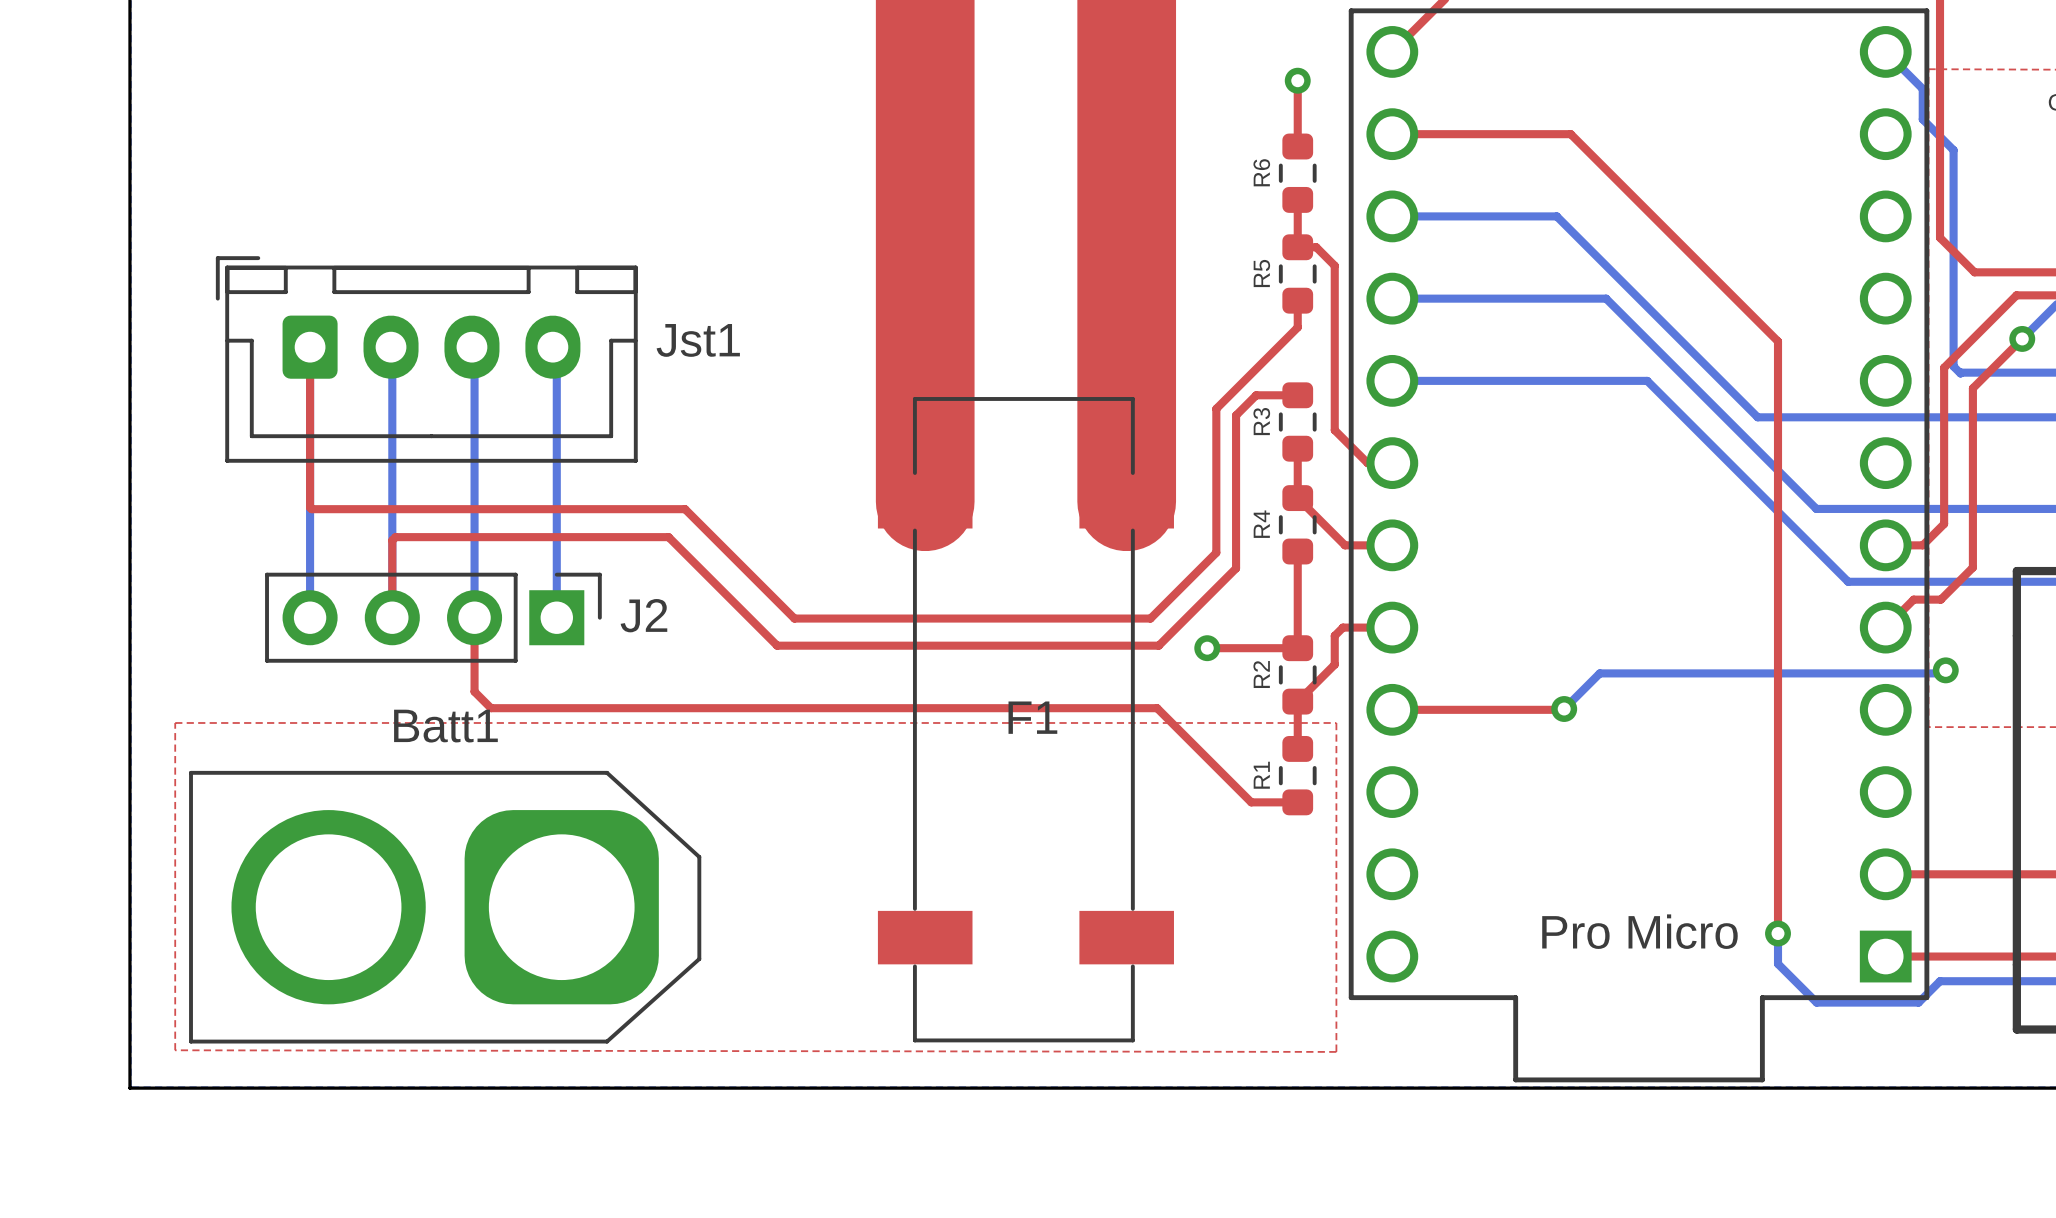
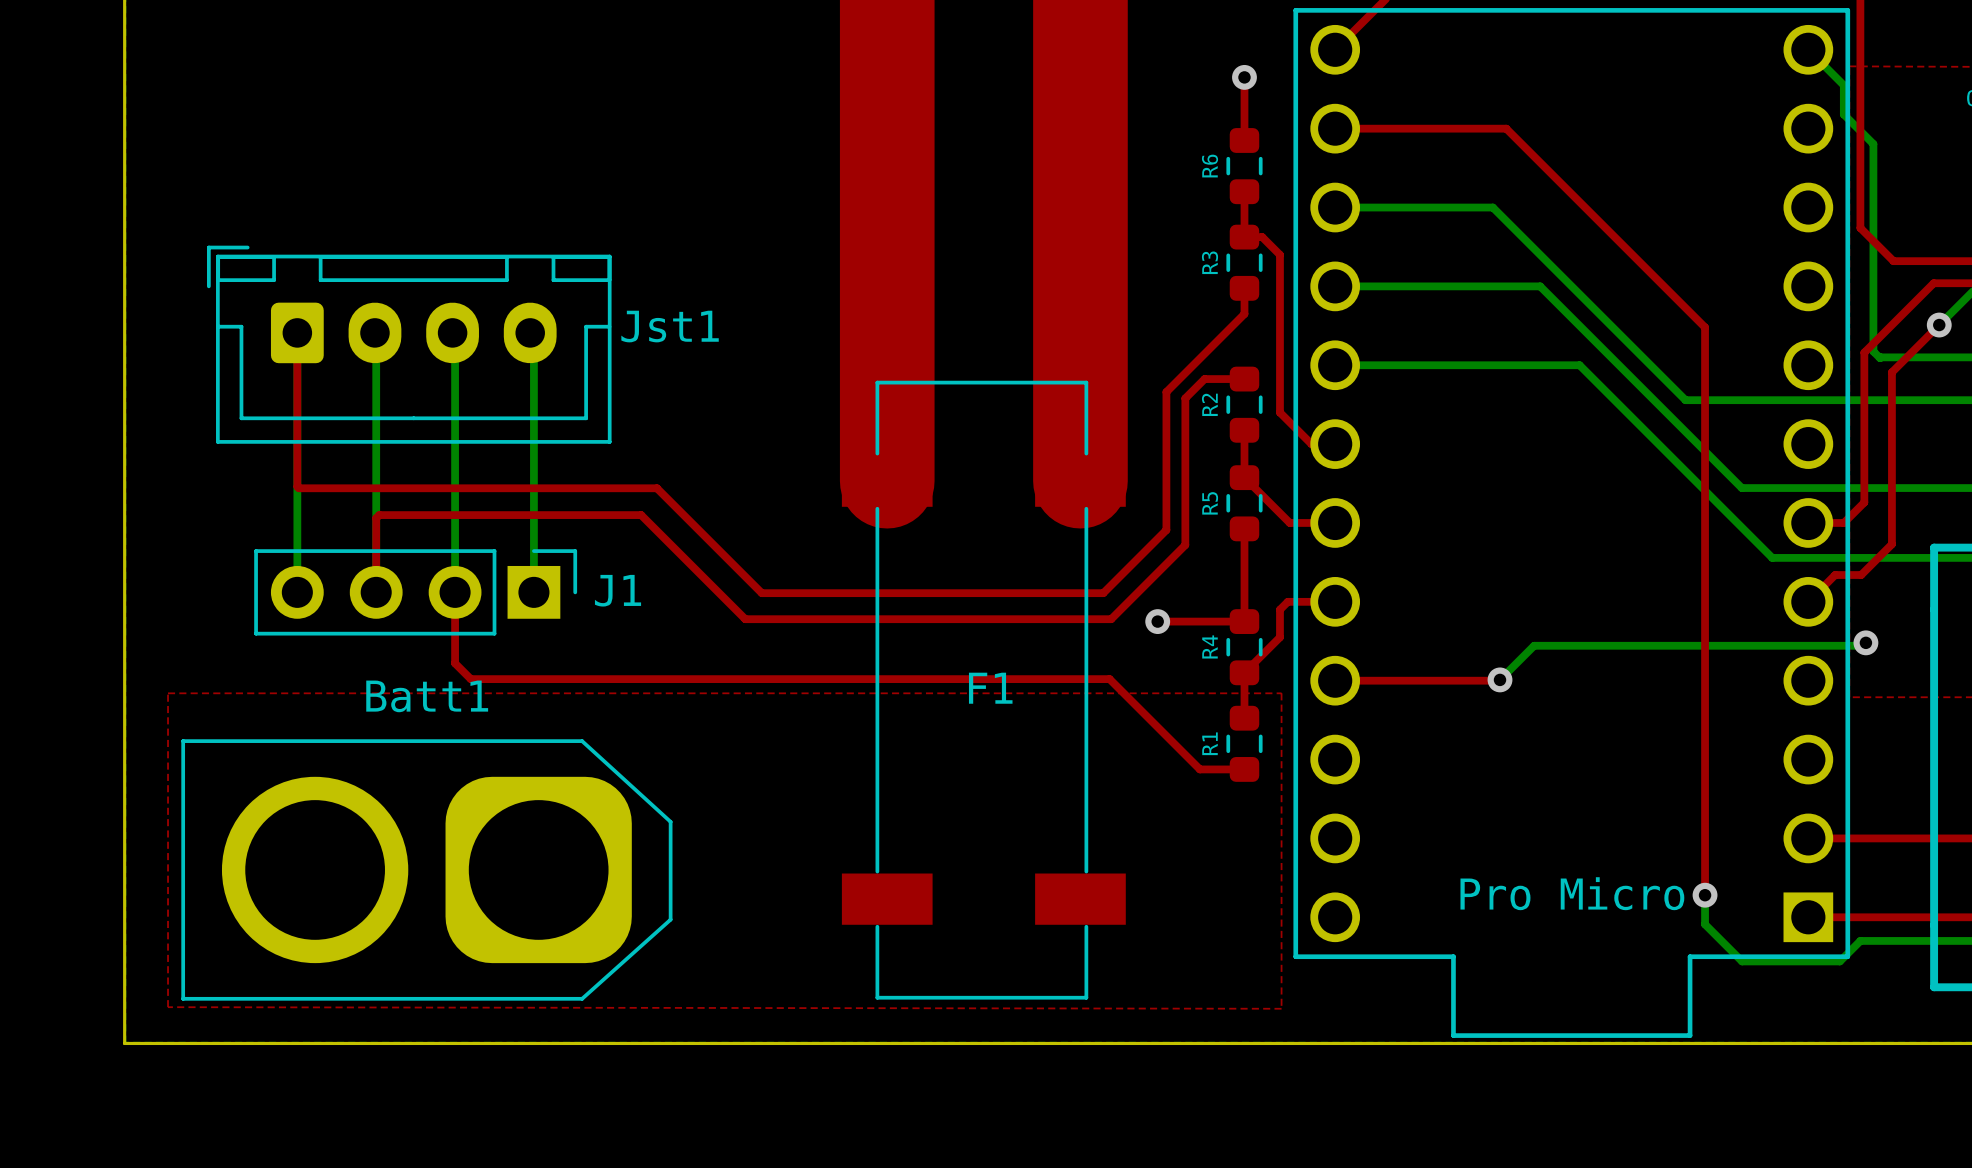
R5 name: R5 (1261, 273) -> R3 (1210, 262)
R3 name: R3 (1261, 421) -> R2 (1209, 404)
R4 name: R4 (1261, 524) -> R5 (1210, 503)
J2 name: J2 (643, 615) -> J1 (618, 590)
R2 name: R2 (1261, 674) -> R4 (1209, 646)

